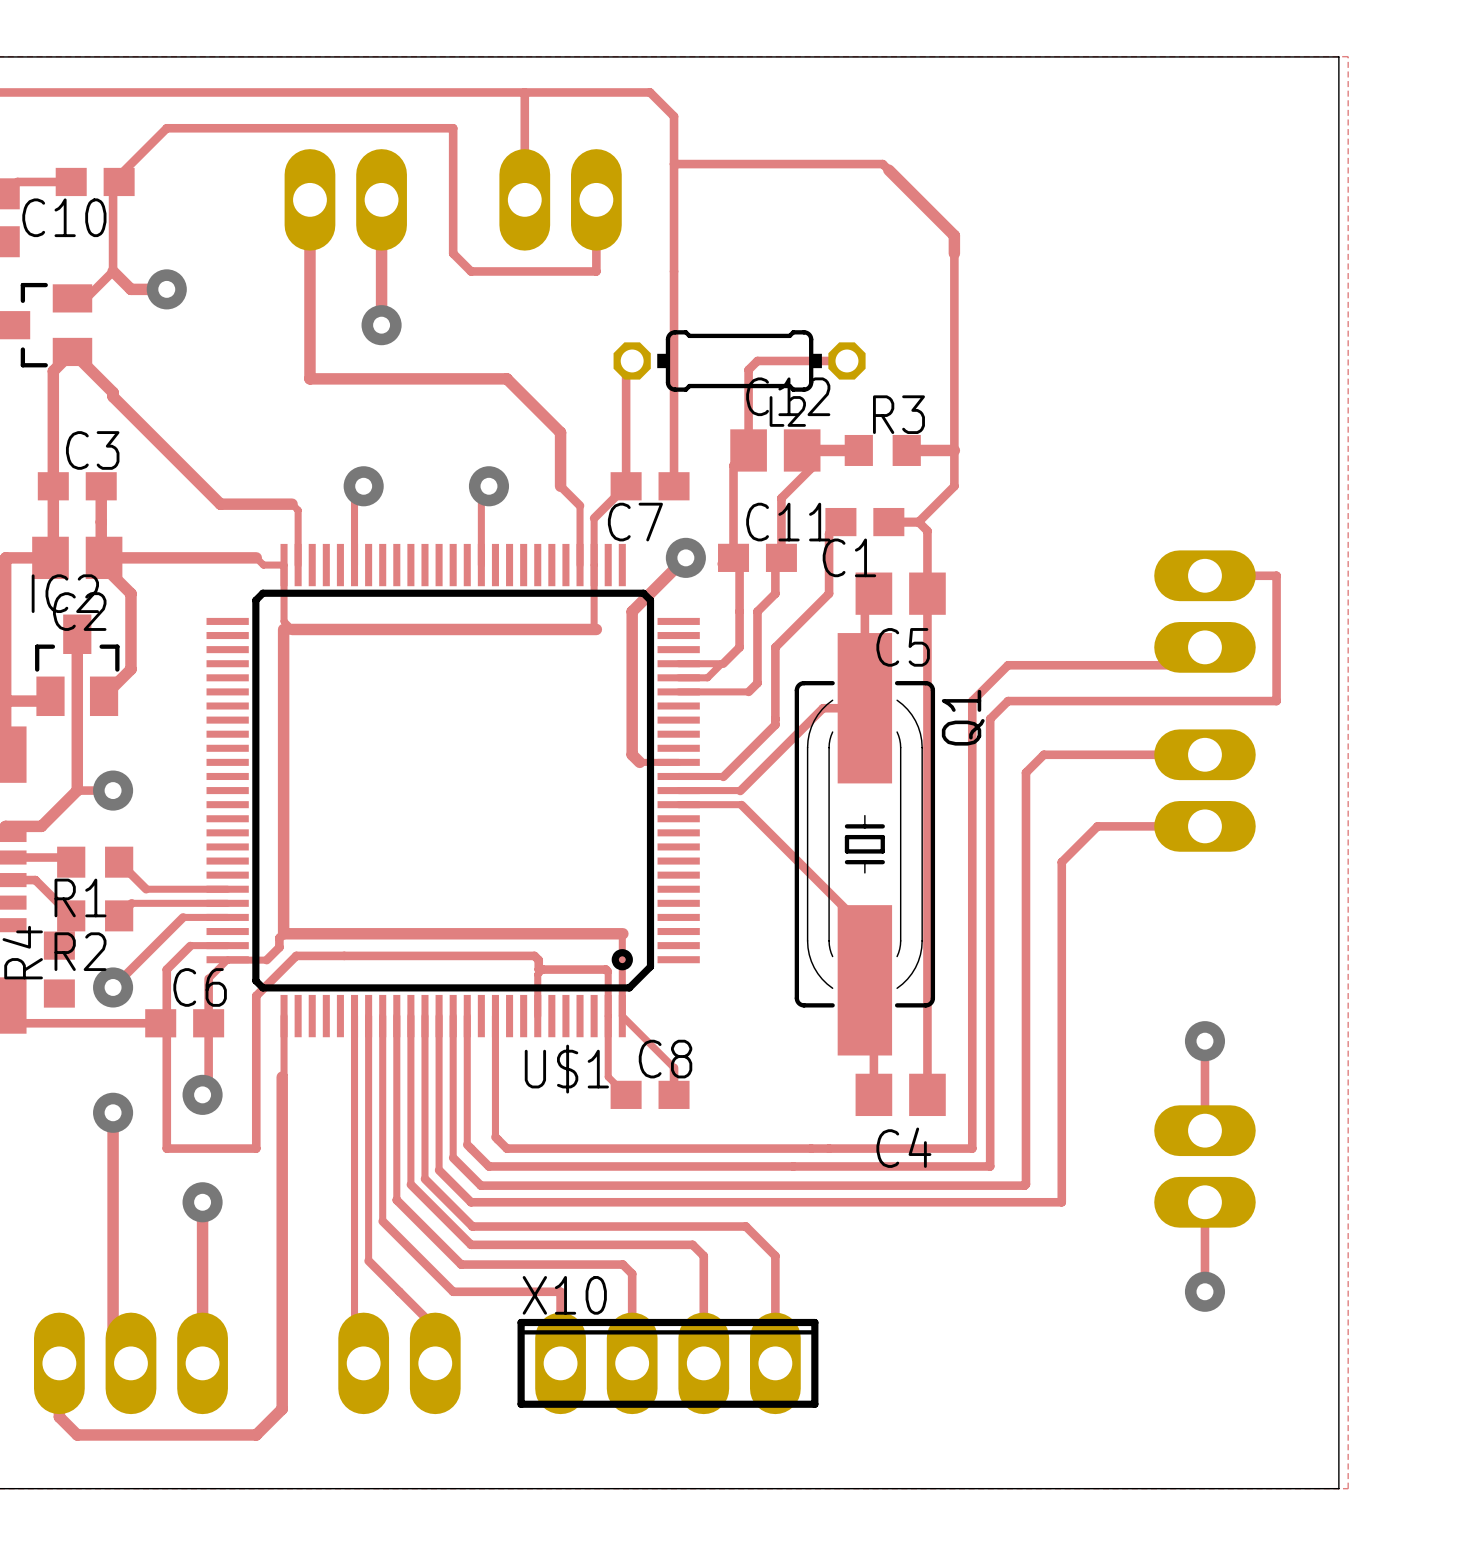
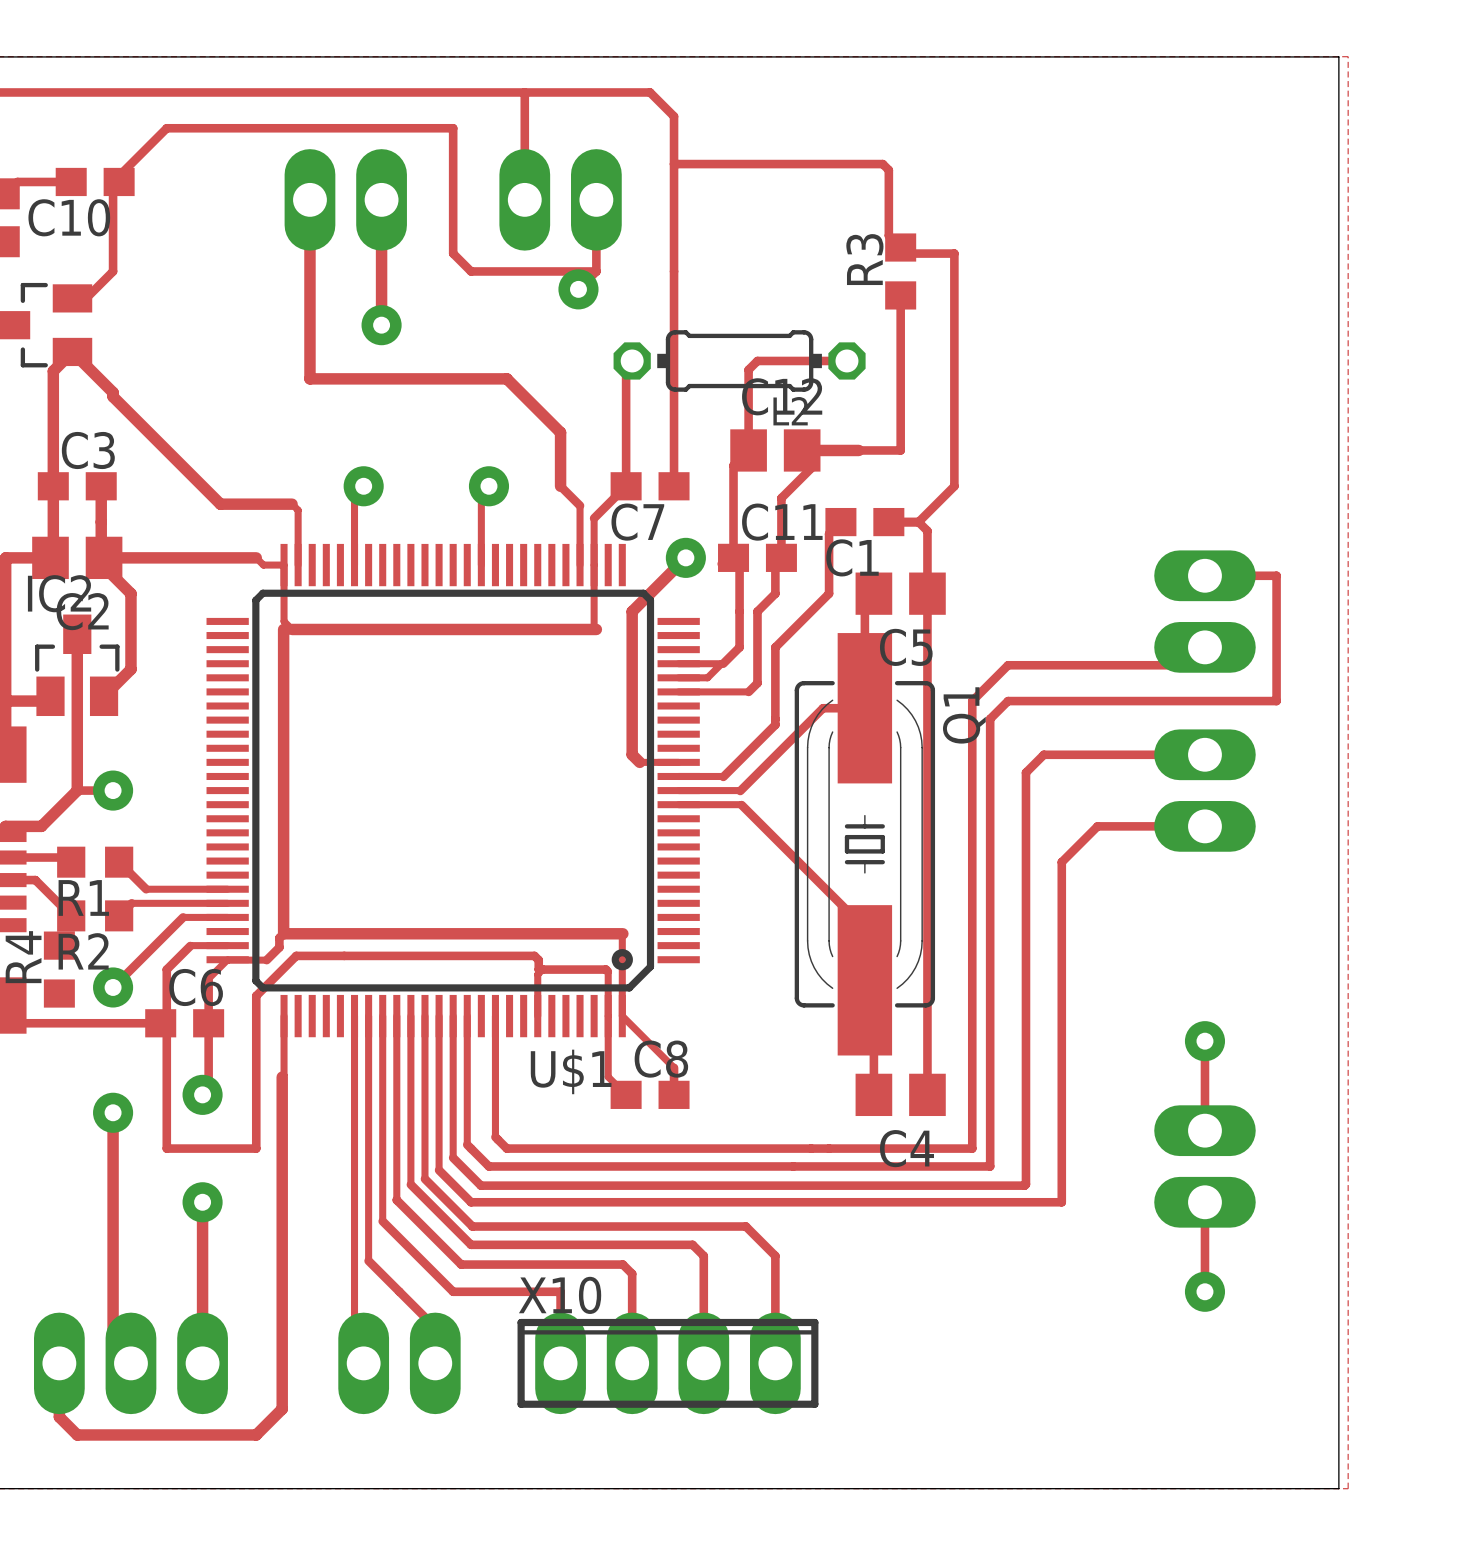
track: (888, 170) (954, 235) (954, 253) -> (888, 170) (888, 235) (906, 253) (954, 253)
track: (113, 271) (130, 289) (166, 289) -> none
via: (166, 289) -> none
via: none -> (578, 289)
track: none -> (900, 295) (900, 450) (858, 450)
R3 name position: R3 (898, 414) -> R3 (864, 259)
R3 rotation: 0° (882, 450) -> 90° clockwise (900, 271)
R3 position: (882, 450) -> (900, 271)
track: (906, 450) (954, 450) -> none

